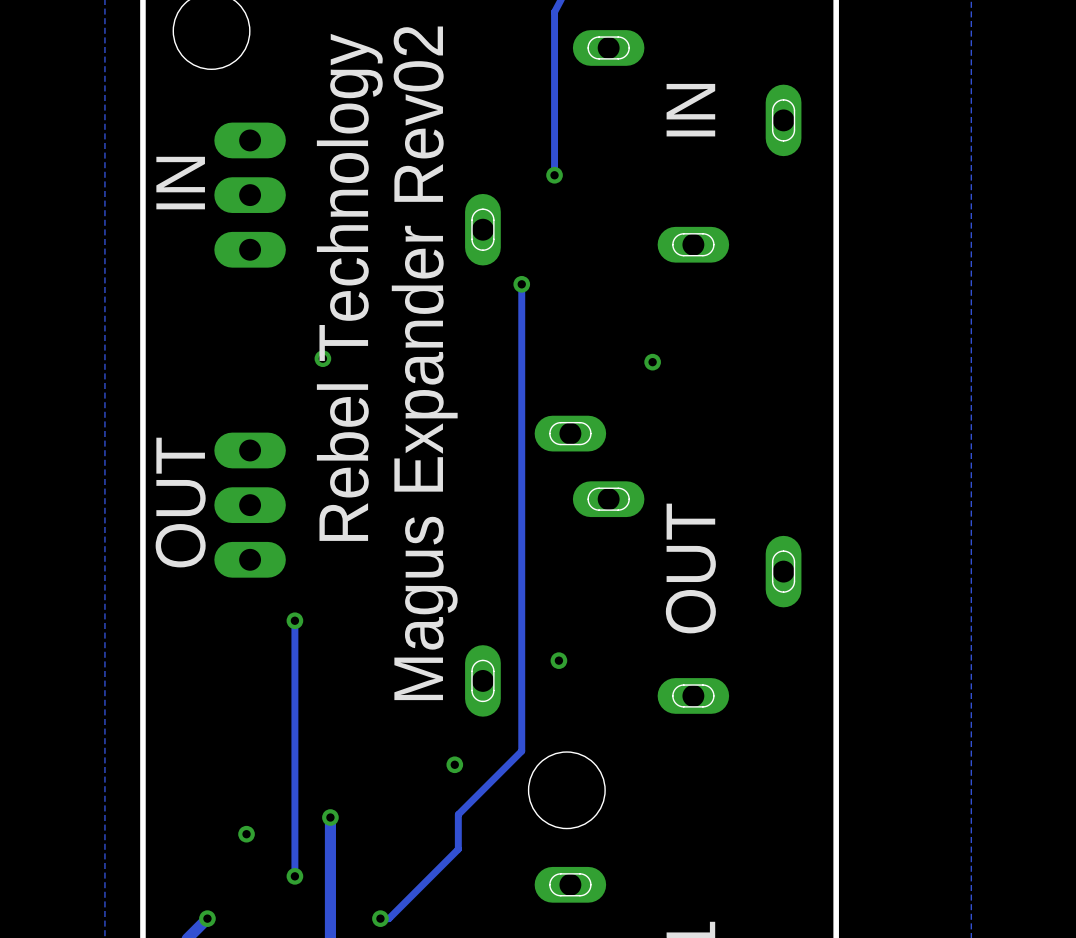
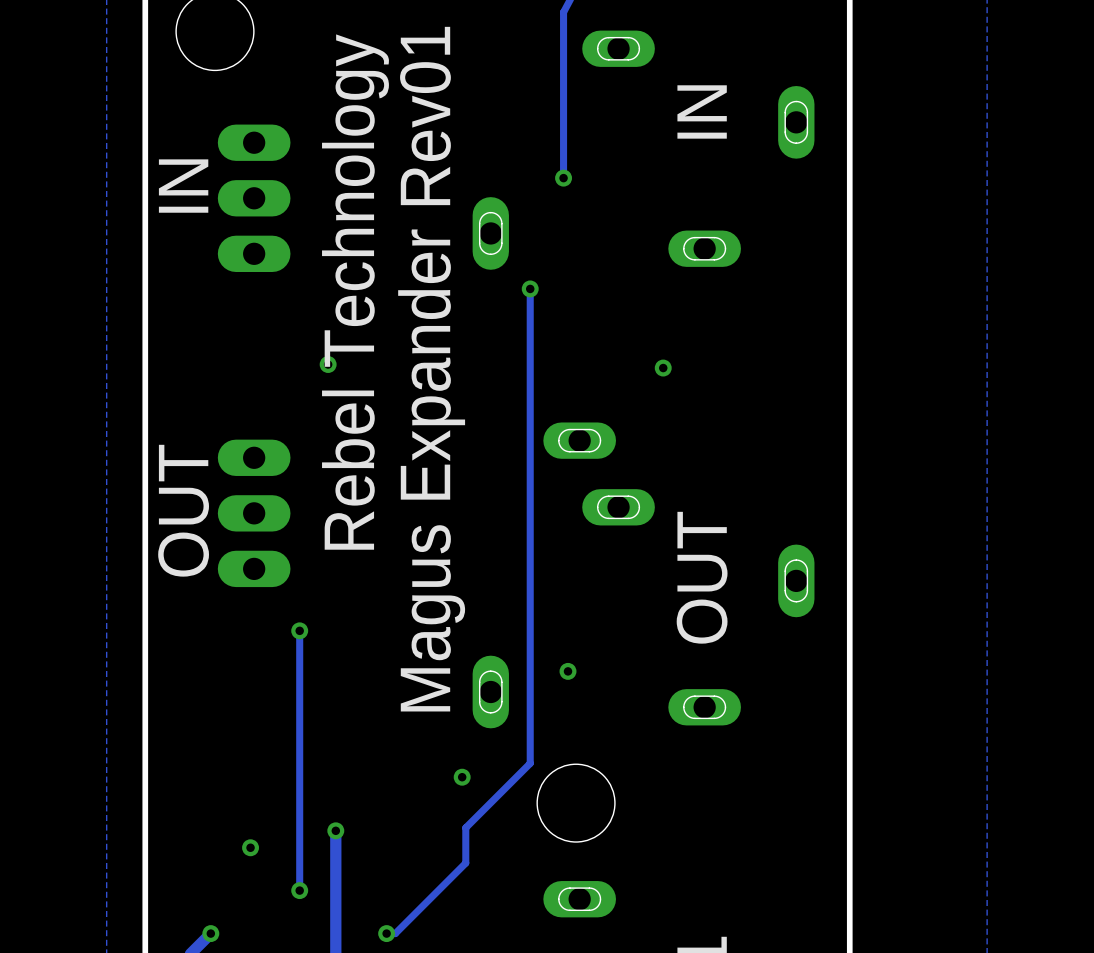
text: Magus Expander Rev02 (424, 363) -> Magus Expander Rev01 (431, 369)

